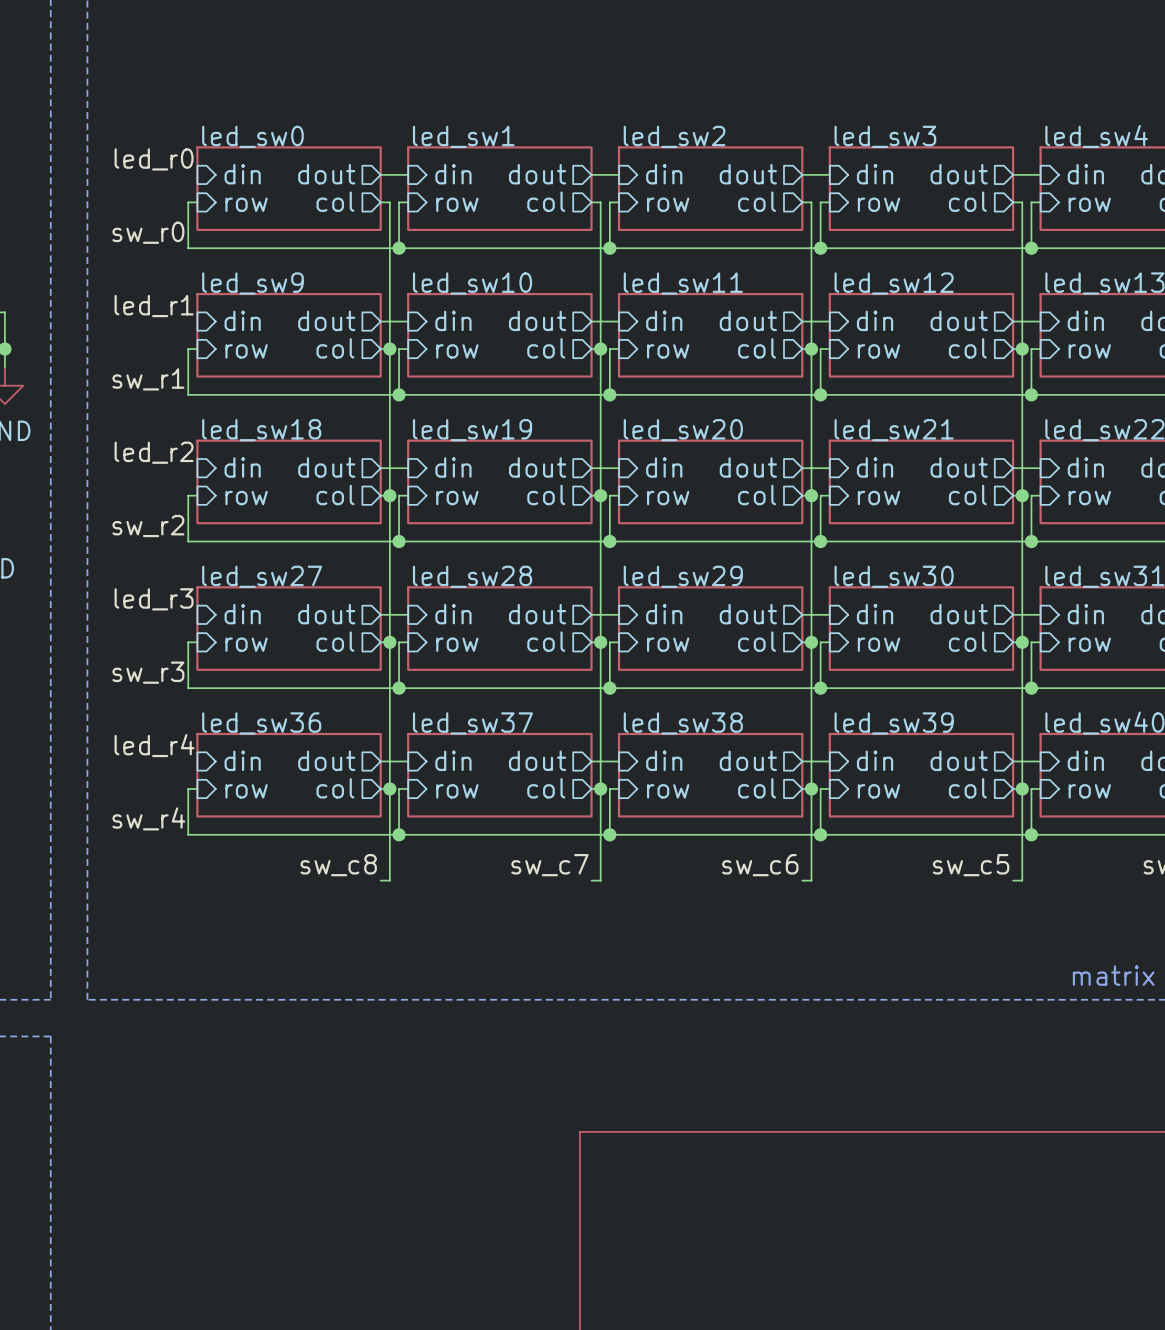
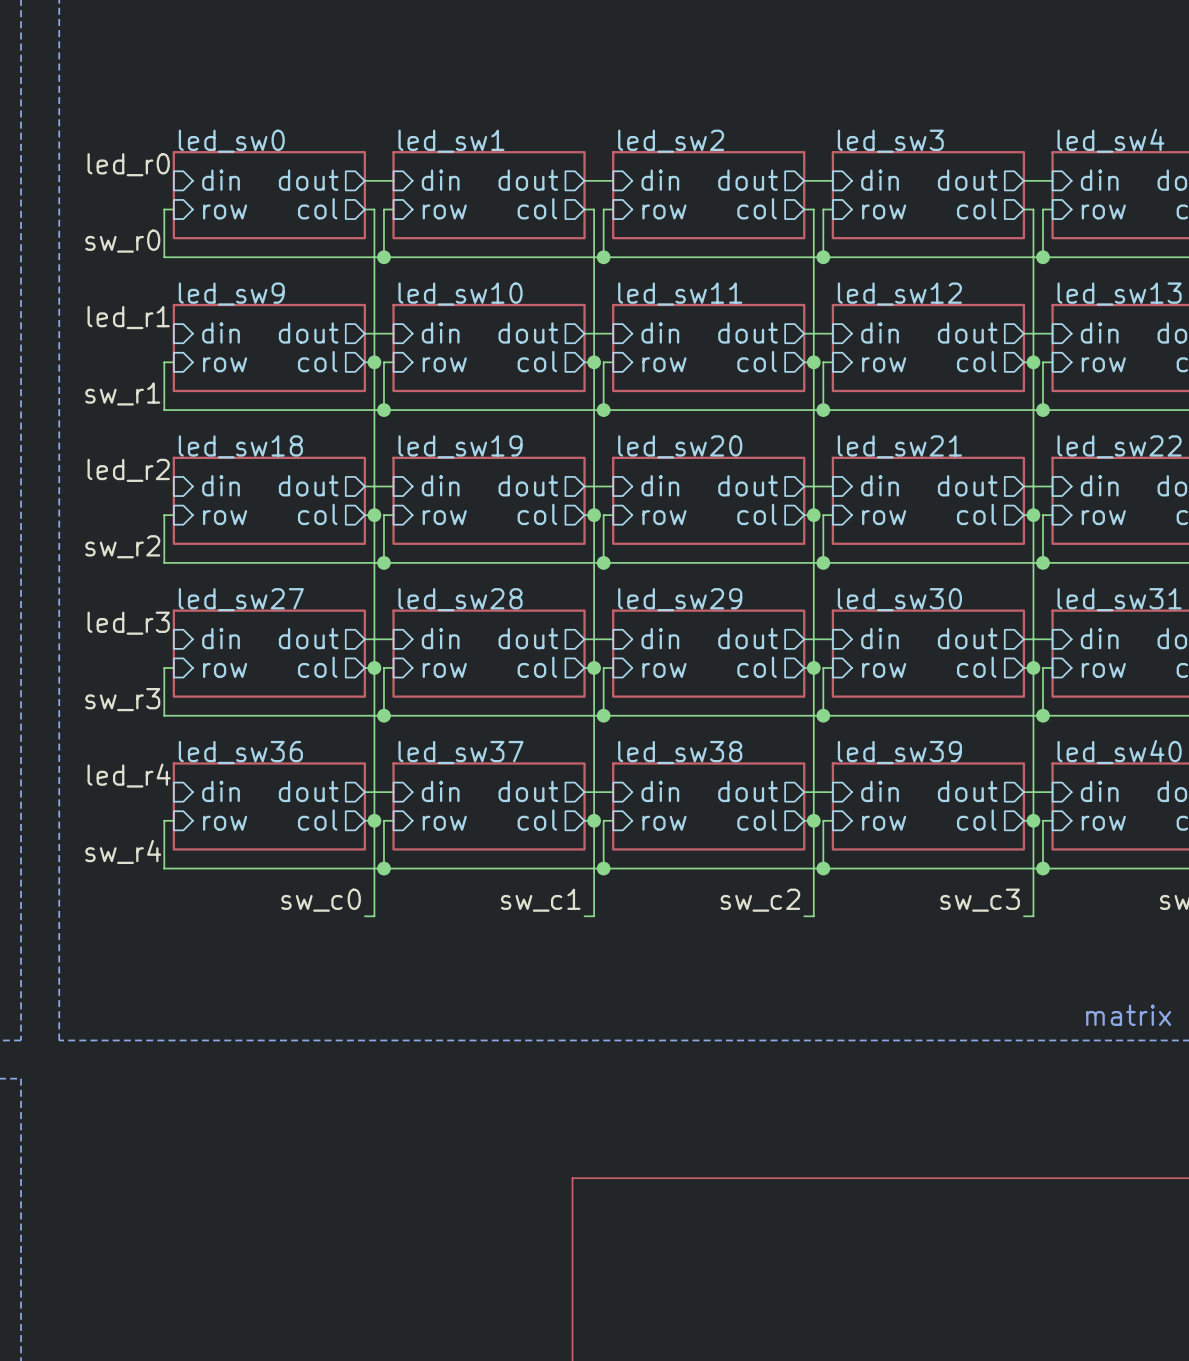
label: sw_c8 (338, 865) -> sw_c0 (321, 900)
label: sw_c7 (549, 865) -> sw_c1 (540, 900)
label: sw_c6 (760, 865) -> sw_c2 (760, 900)
label: sw_c5 (971, 865) -> sw_c3 (980, 900)

